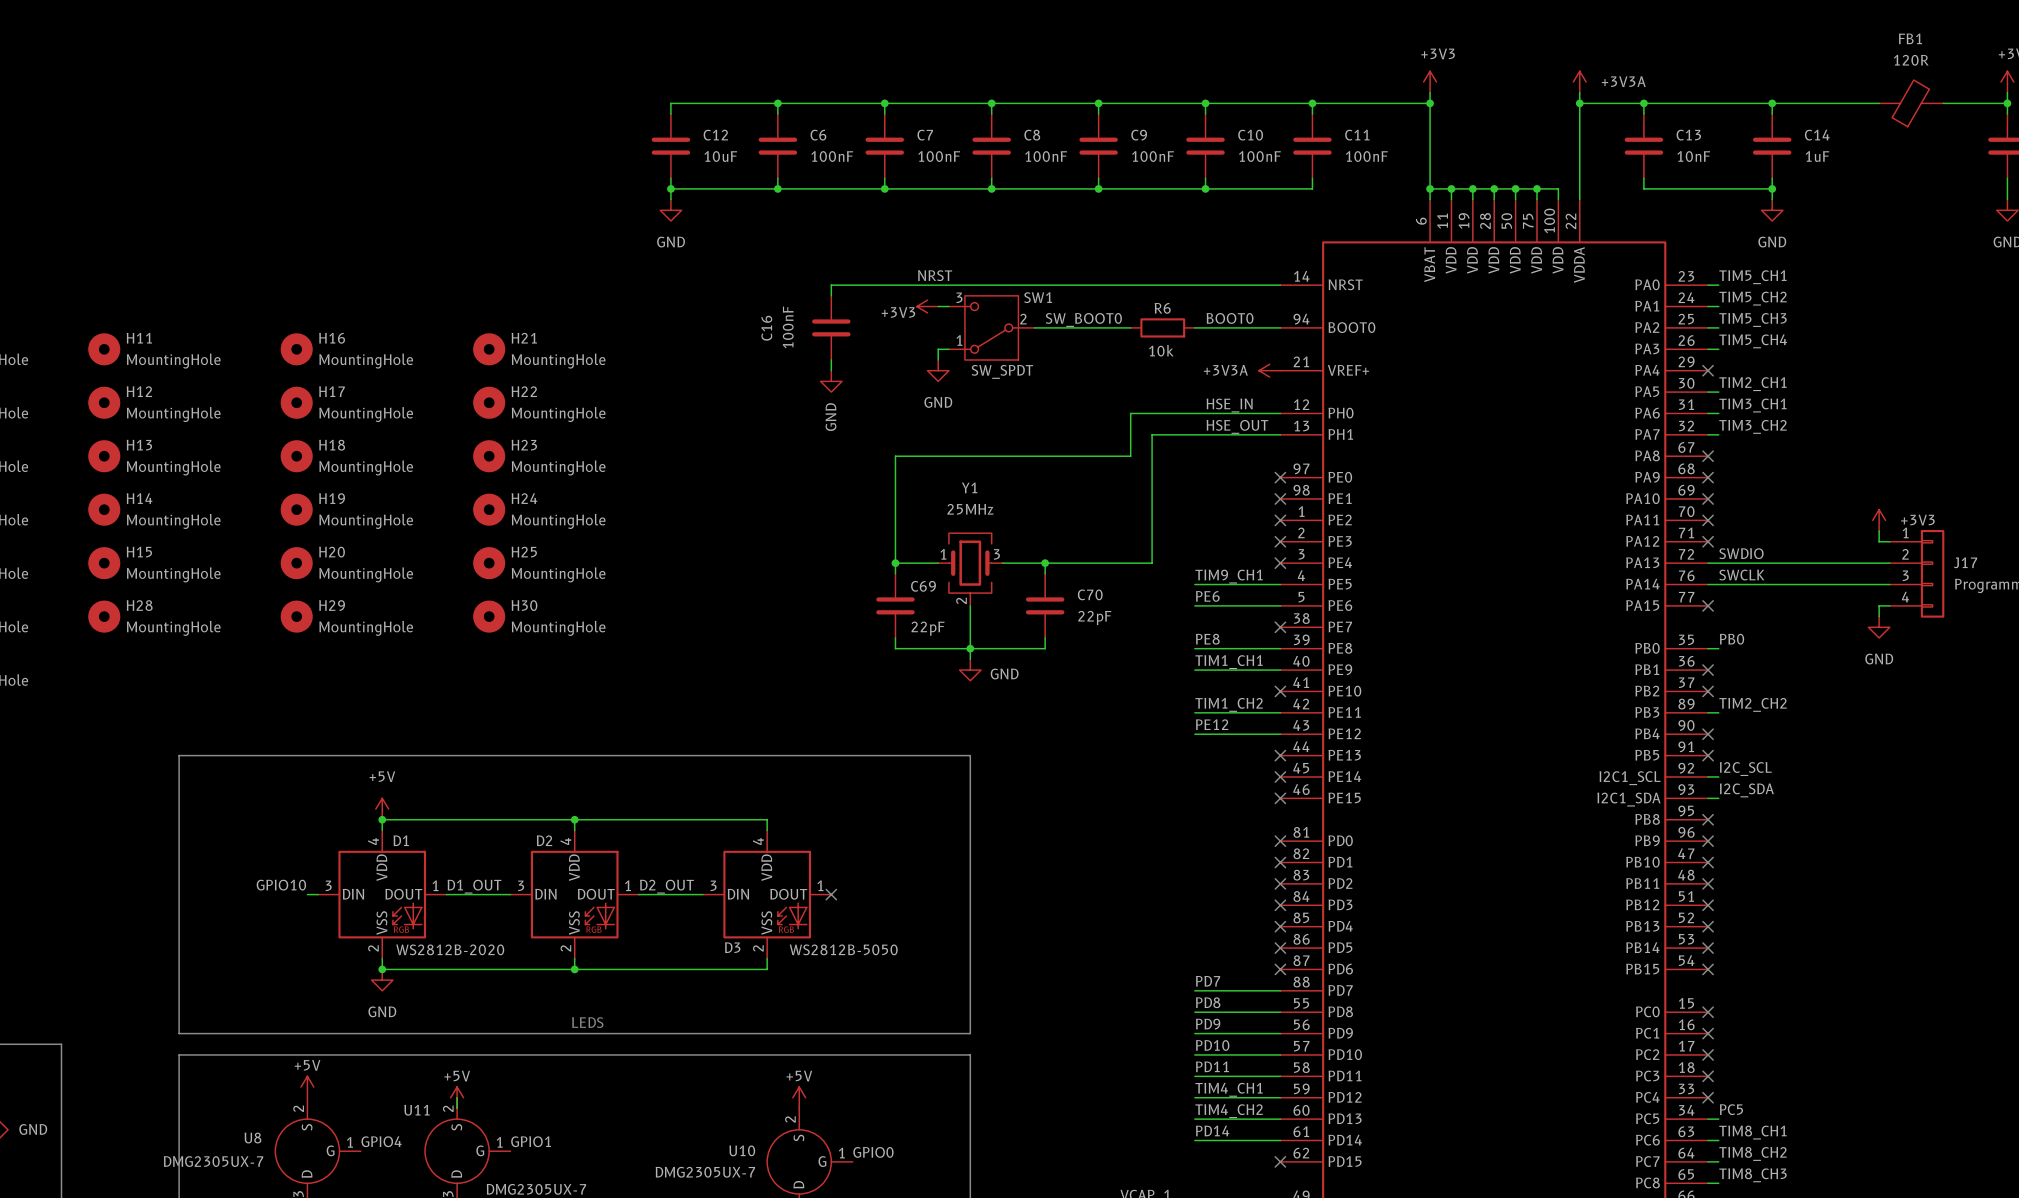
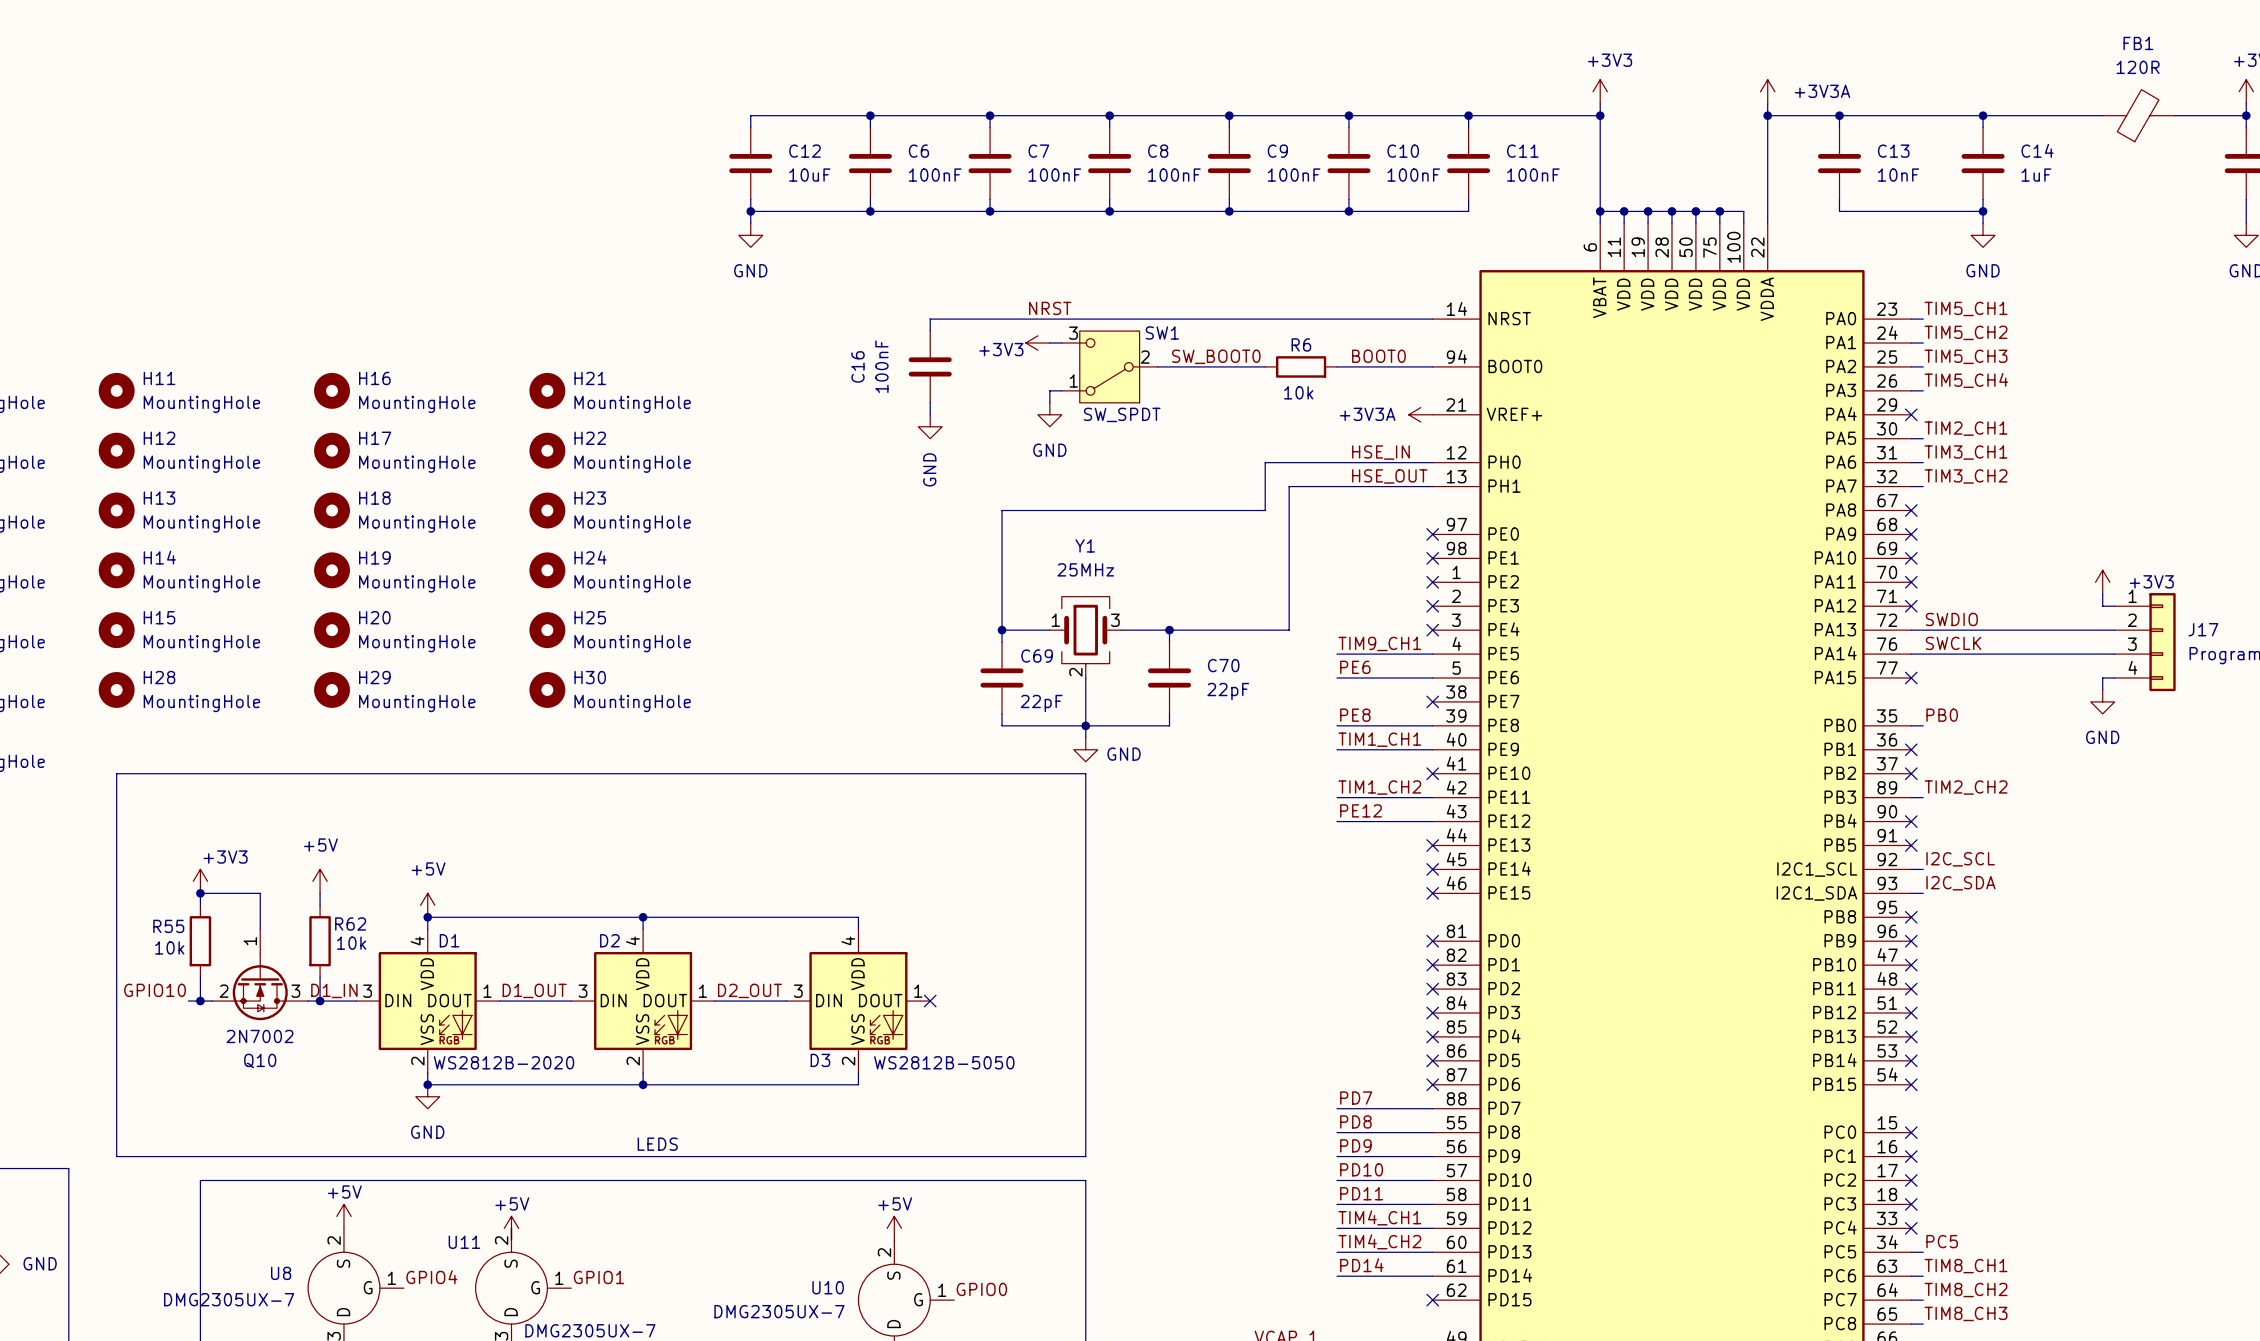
line: (970, 755) (179, 755) (179, 1033) -> (1085, 845) (1085, 773) (116, 773) (116, 1156) (200, 1156)
power symbol: none -> +3V3 (200, 881)
power symbol: none -> +5V (320, 881)
junction: none -> (200, 893)
wire: none -> (320, 893) (320, 905)
wire: none -> (200, 905) (200, 893) (260, 893) (260, 929)
R55: none -> 10k (200, 941)
R62: none -> 10k (320, 941)
Q10: none -> 2N7002 (260, 974)
wire: none -> (320, 977) (320, 1001)
label position: GPIO10 (281, 885) -> GPIO10 (155, 990)
label: none -> D1_IN (334, 990)
wire: none -> (188, 1001) (212, 1001)
junction: none -> (200, 1001)
wire: none -> (308, 1001) (343, 1001)
junction: none -> (320, 1001)

